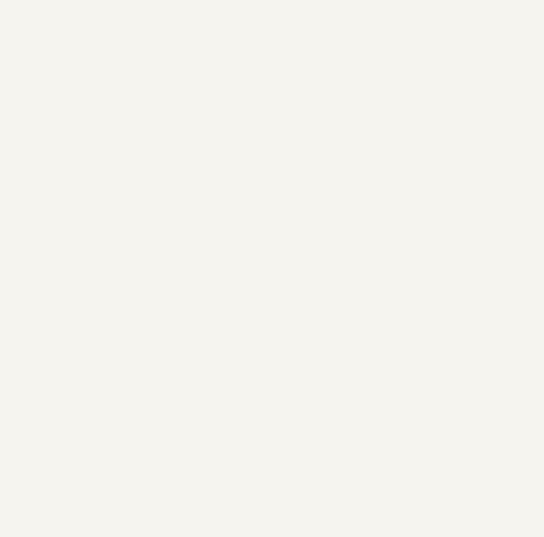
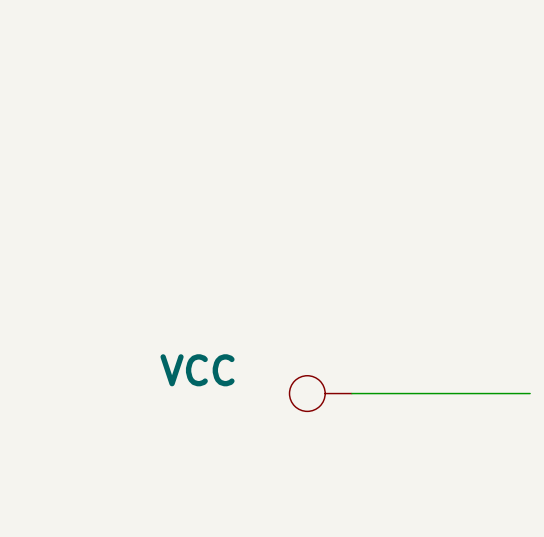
power symbol: none -> VCC (320, 393)
wire: none -> (351, 393) (530, 393)

